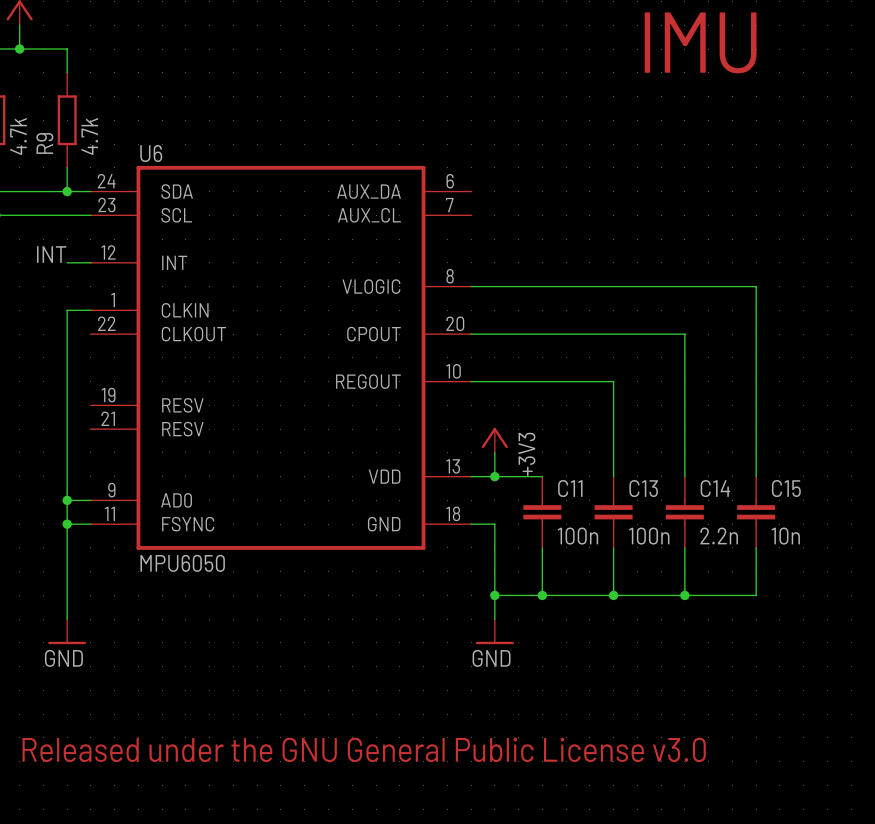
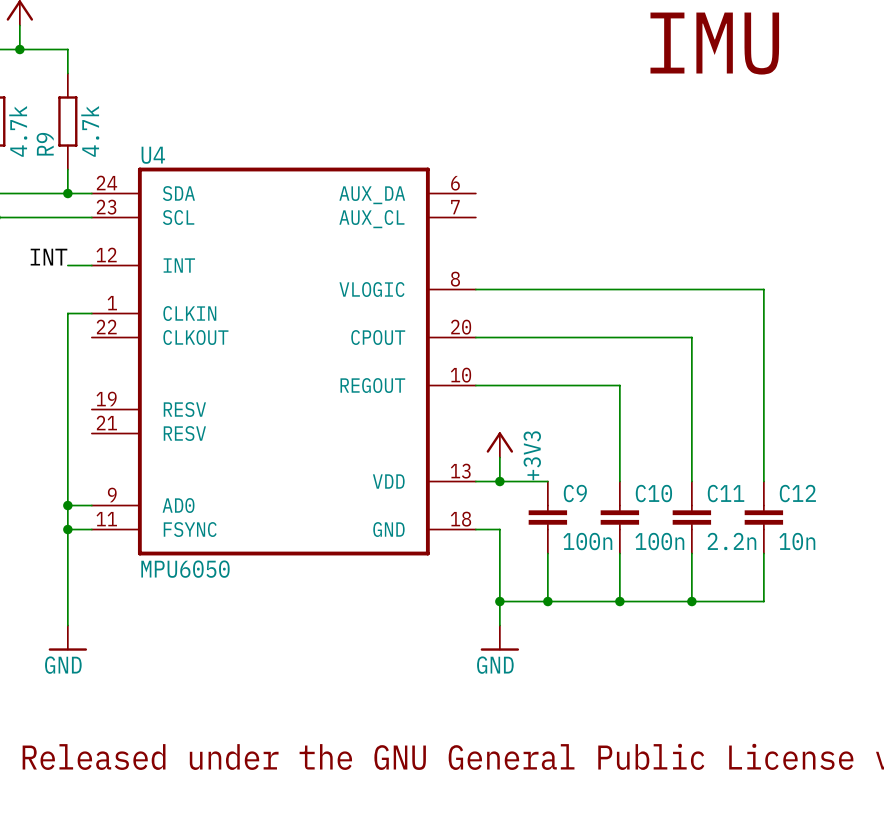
U6 name: U6 (151, 153) -> U4 (153, 155)
C11 name: C11 (570, 488) -> C9 (575, 493)
C13 name: C13 (643, 488) -> C10 (653, 493)
C14 name: C14 (715, 488) -> C11 (726, 493)
C15 name: C15 (786, 488) -> C12 (797, 493)

